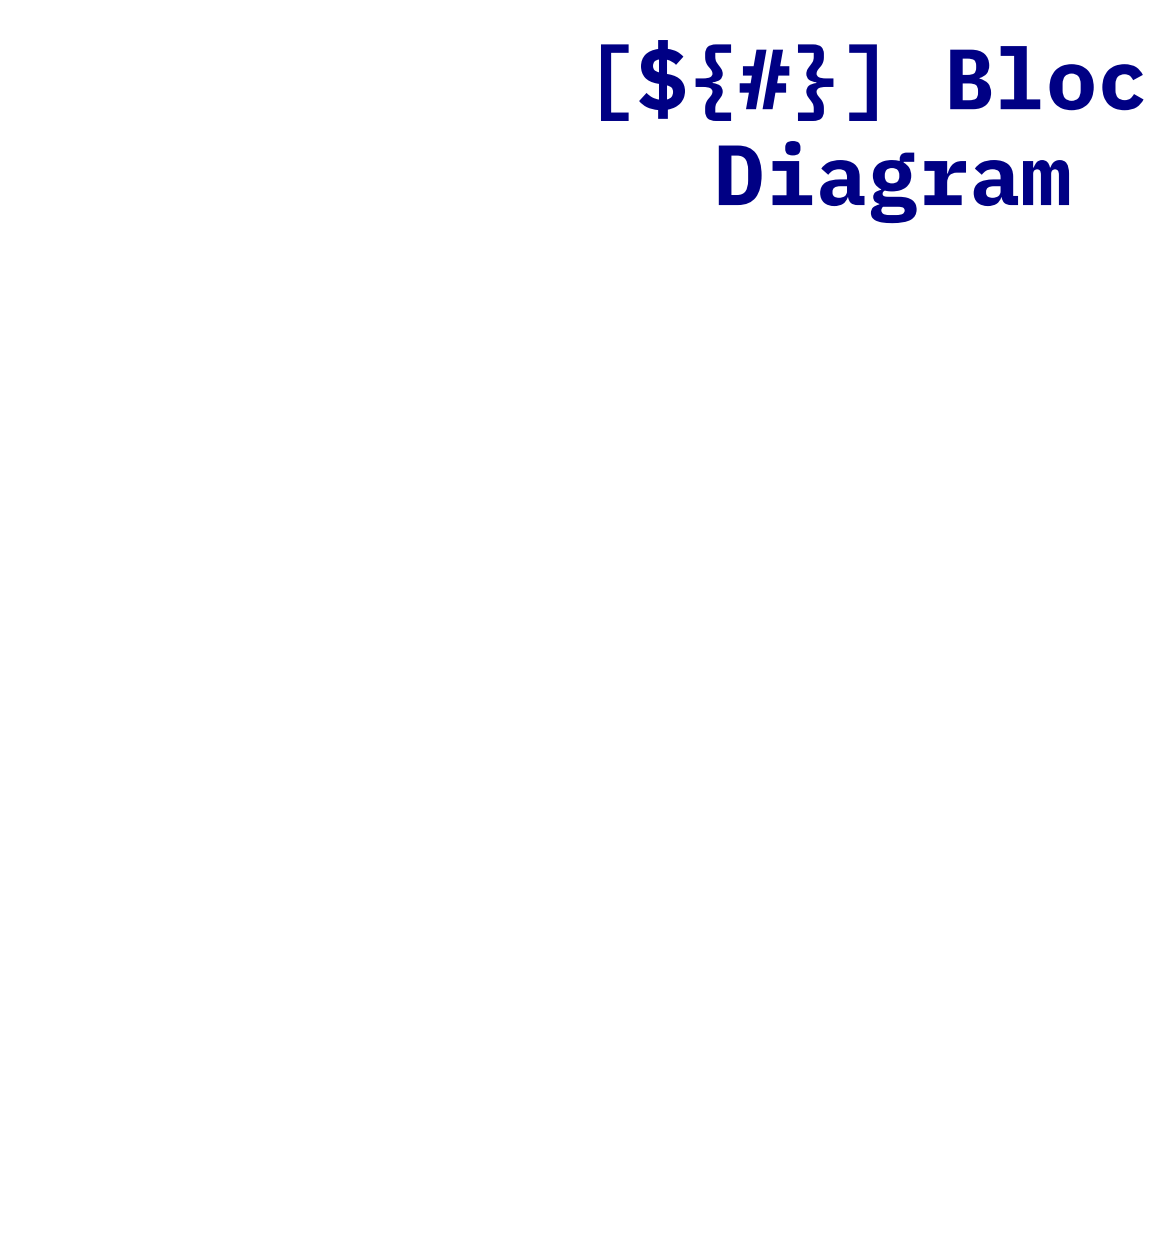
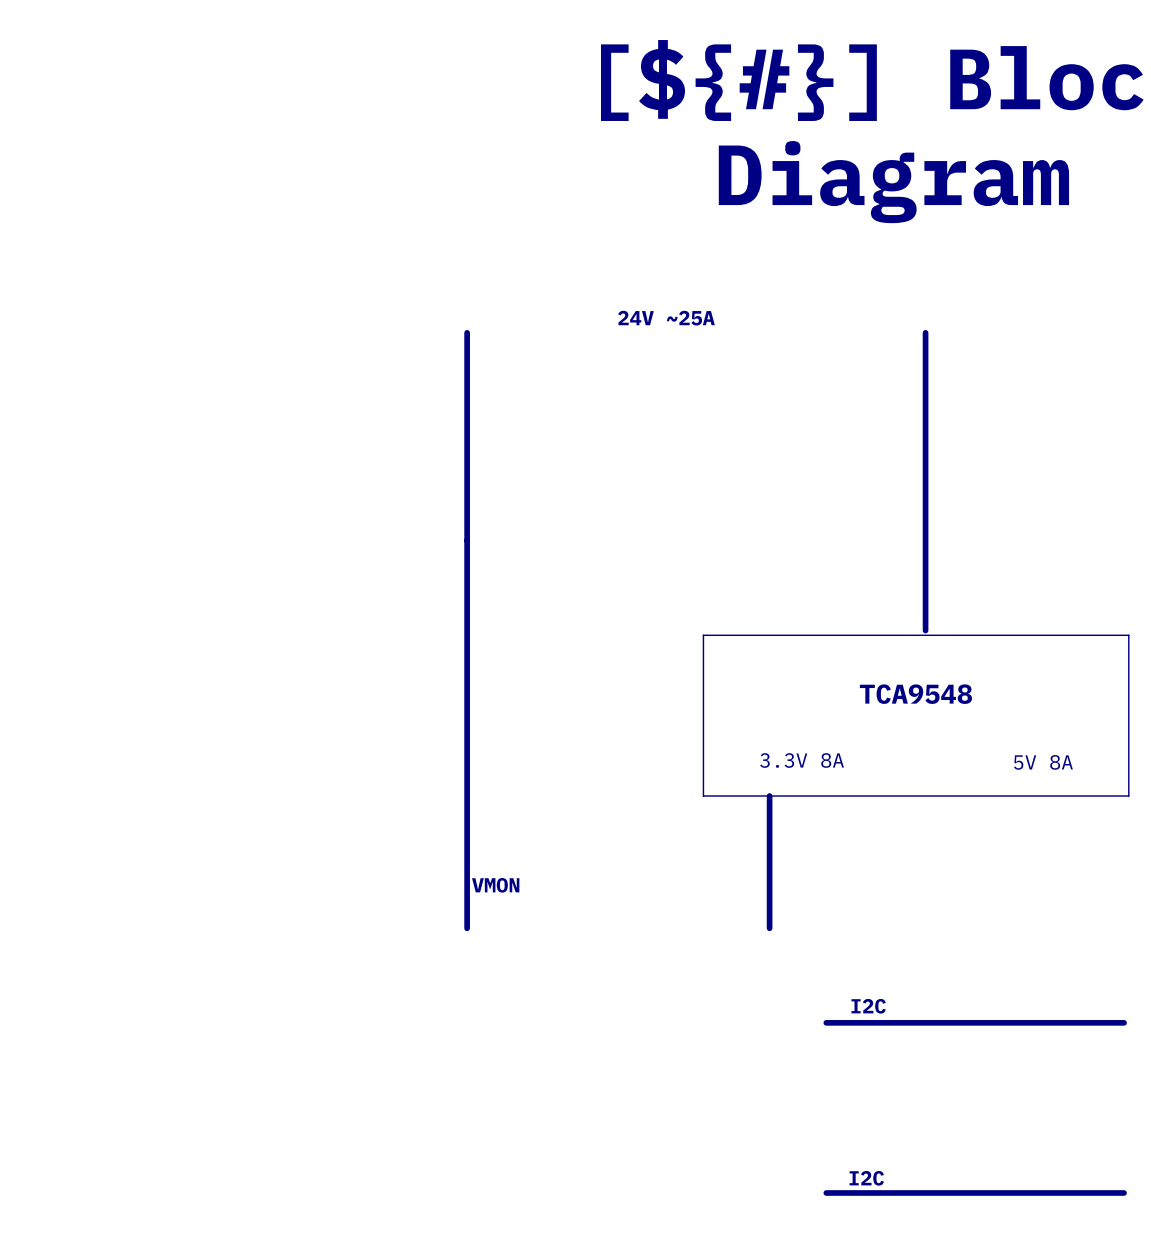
text: none -> 24V ~25A (666, 318)
line: none -> (467, 332) (467, 928)
line: none -> (925, 332) (925, 630)
line: none -> (703, 635) (1128, 635) (1128, 795) (703, 795) (703, 635)
text: none -> TCA9548 (915, 694)
text: none -> 3.3V 8A (802, 760)
text: none -> 5V 8A (1043, 762)
line: none -> (769, 795) (769, 928)
text: none -> VMON (495, 885)
text: none -> I2C (868, 1006)
line: none -> (826, 1022) (1124, 1022)
text: none -> I2C (866, 1178)
line: none -> (826, 1192) (1124, 1192)

